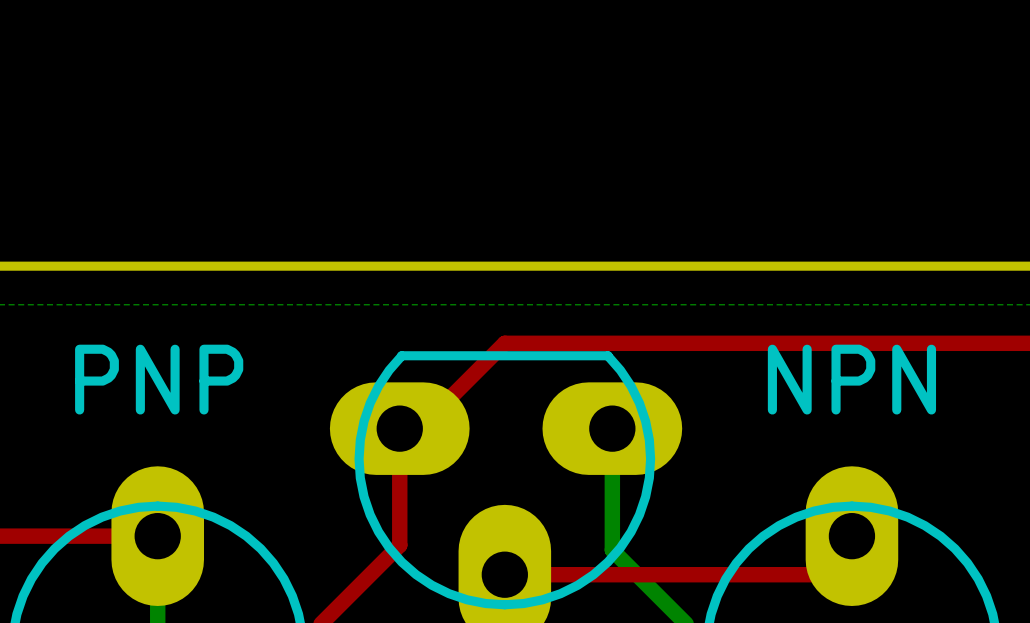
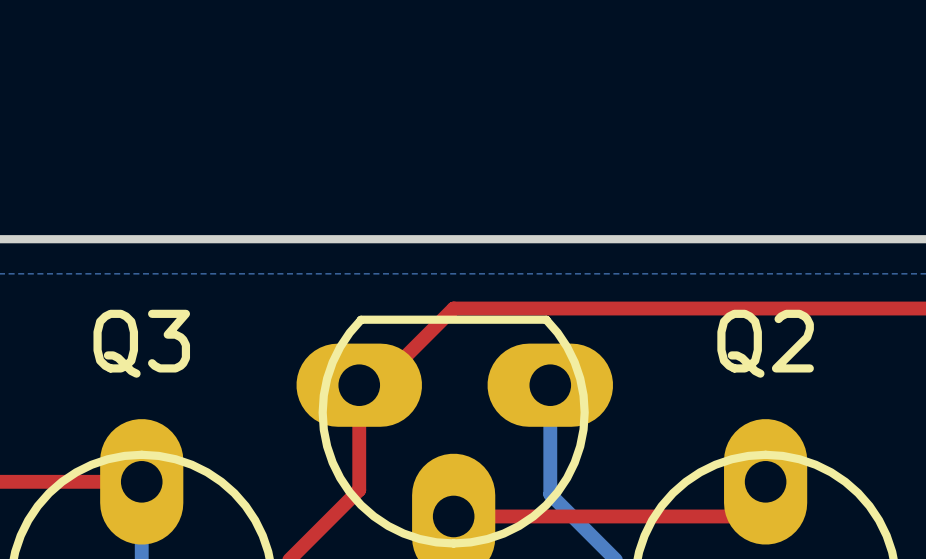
PNP name: PNP (159, 379) -> Q3 (141, 343)
NPN name: NPN (851, 379) -> Q2 (765, 343)

